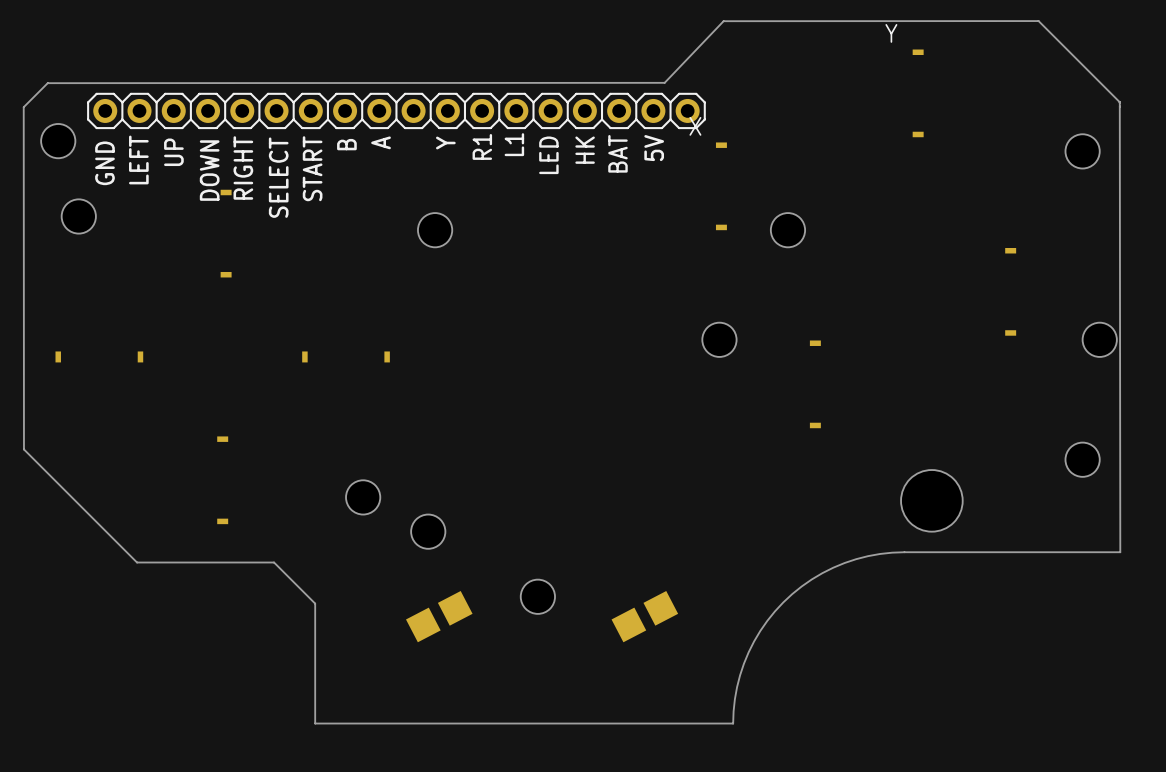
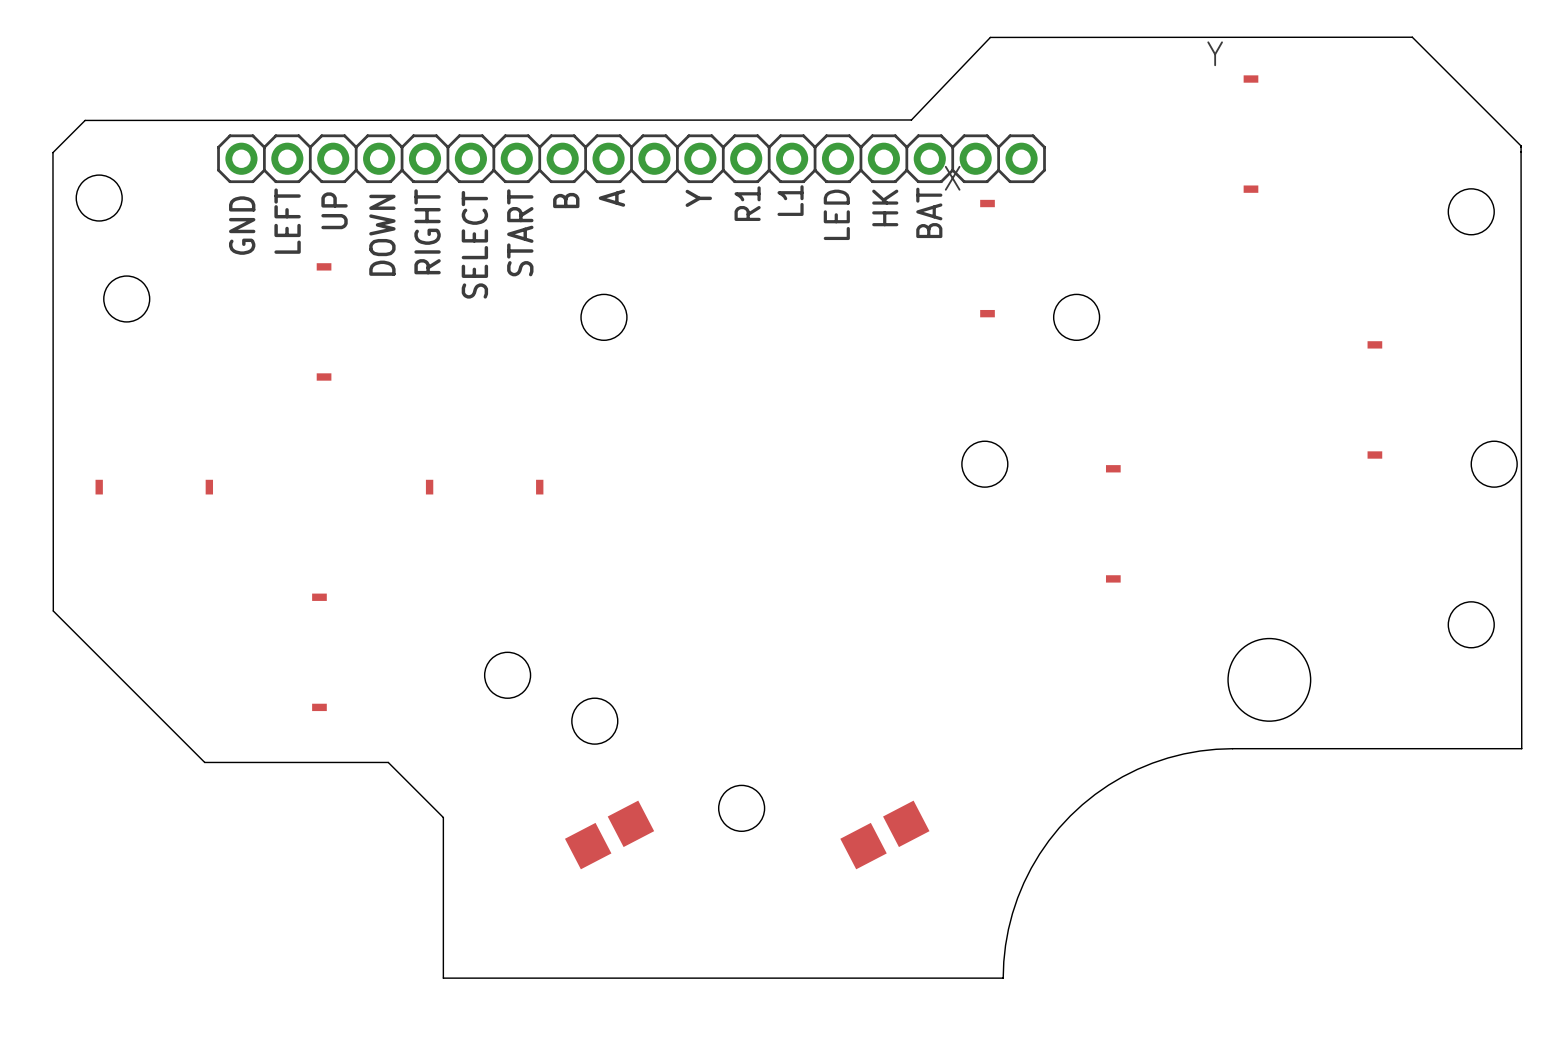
part position: (396, 110) -> (631, 158)
text position: A (381, 142) -> A (611, 198)
text position: Y (445, 143) -> Y (698, 198)
text position: B (346, 144) -> B (566, 200)
text position: L1 (514, 144) -> L1 (790, 200)
text position: R1 (482, 146) -> R1 (747, 203)
text: 5V (654, 148) -> none
text position: HK (585, 150) -> HK (885, 207)
text position: UP (173, 152) -> UP (334, 210)
text position: BAT (617, 153) -> BAT (929, 212)
text position: LED (548, 155) -> LED (836, 214)
text position: LEFT (138, 159) -> LEFT (287, 221)
text position: GND (104, 163) -> GND (242, 225)
text position: RIGHT (243, 167) -> RIGHT (427, 231)
text position: START (312, 168) -> START (520, 232)
text position: DOWN (209, 170) -> DOWN (382, 235)
text position: SELECT (278, 177) -> SELECT (474, 244)

